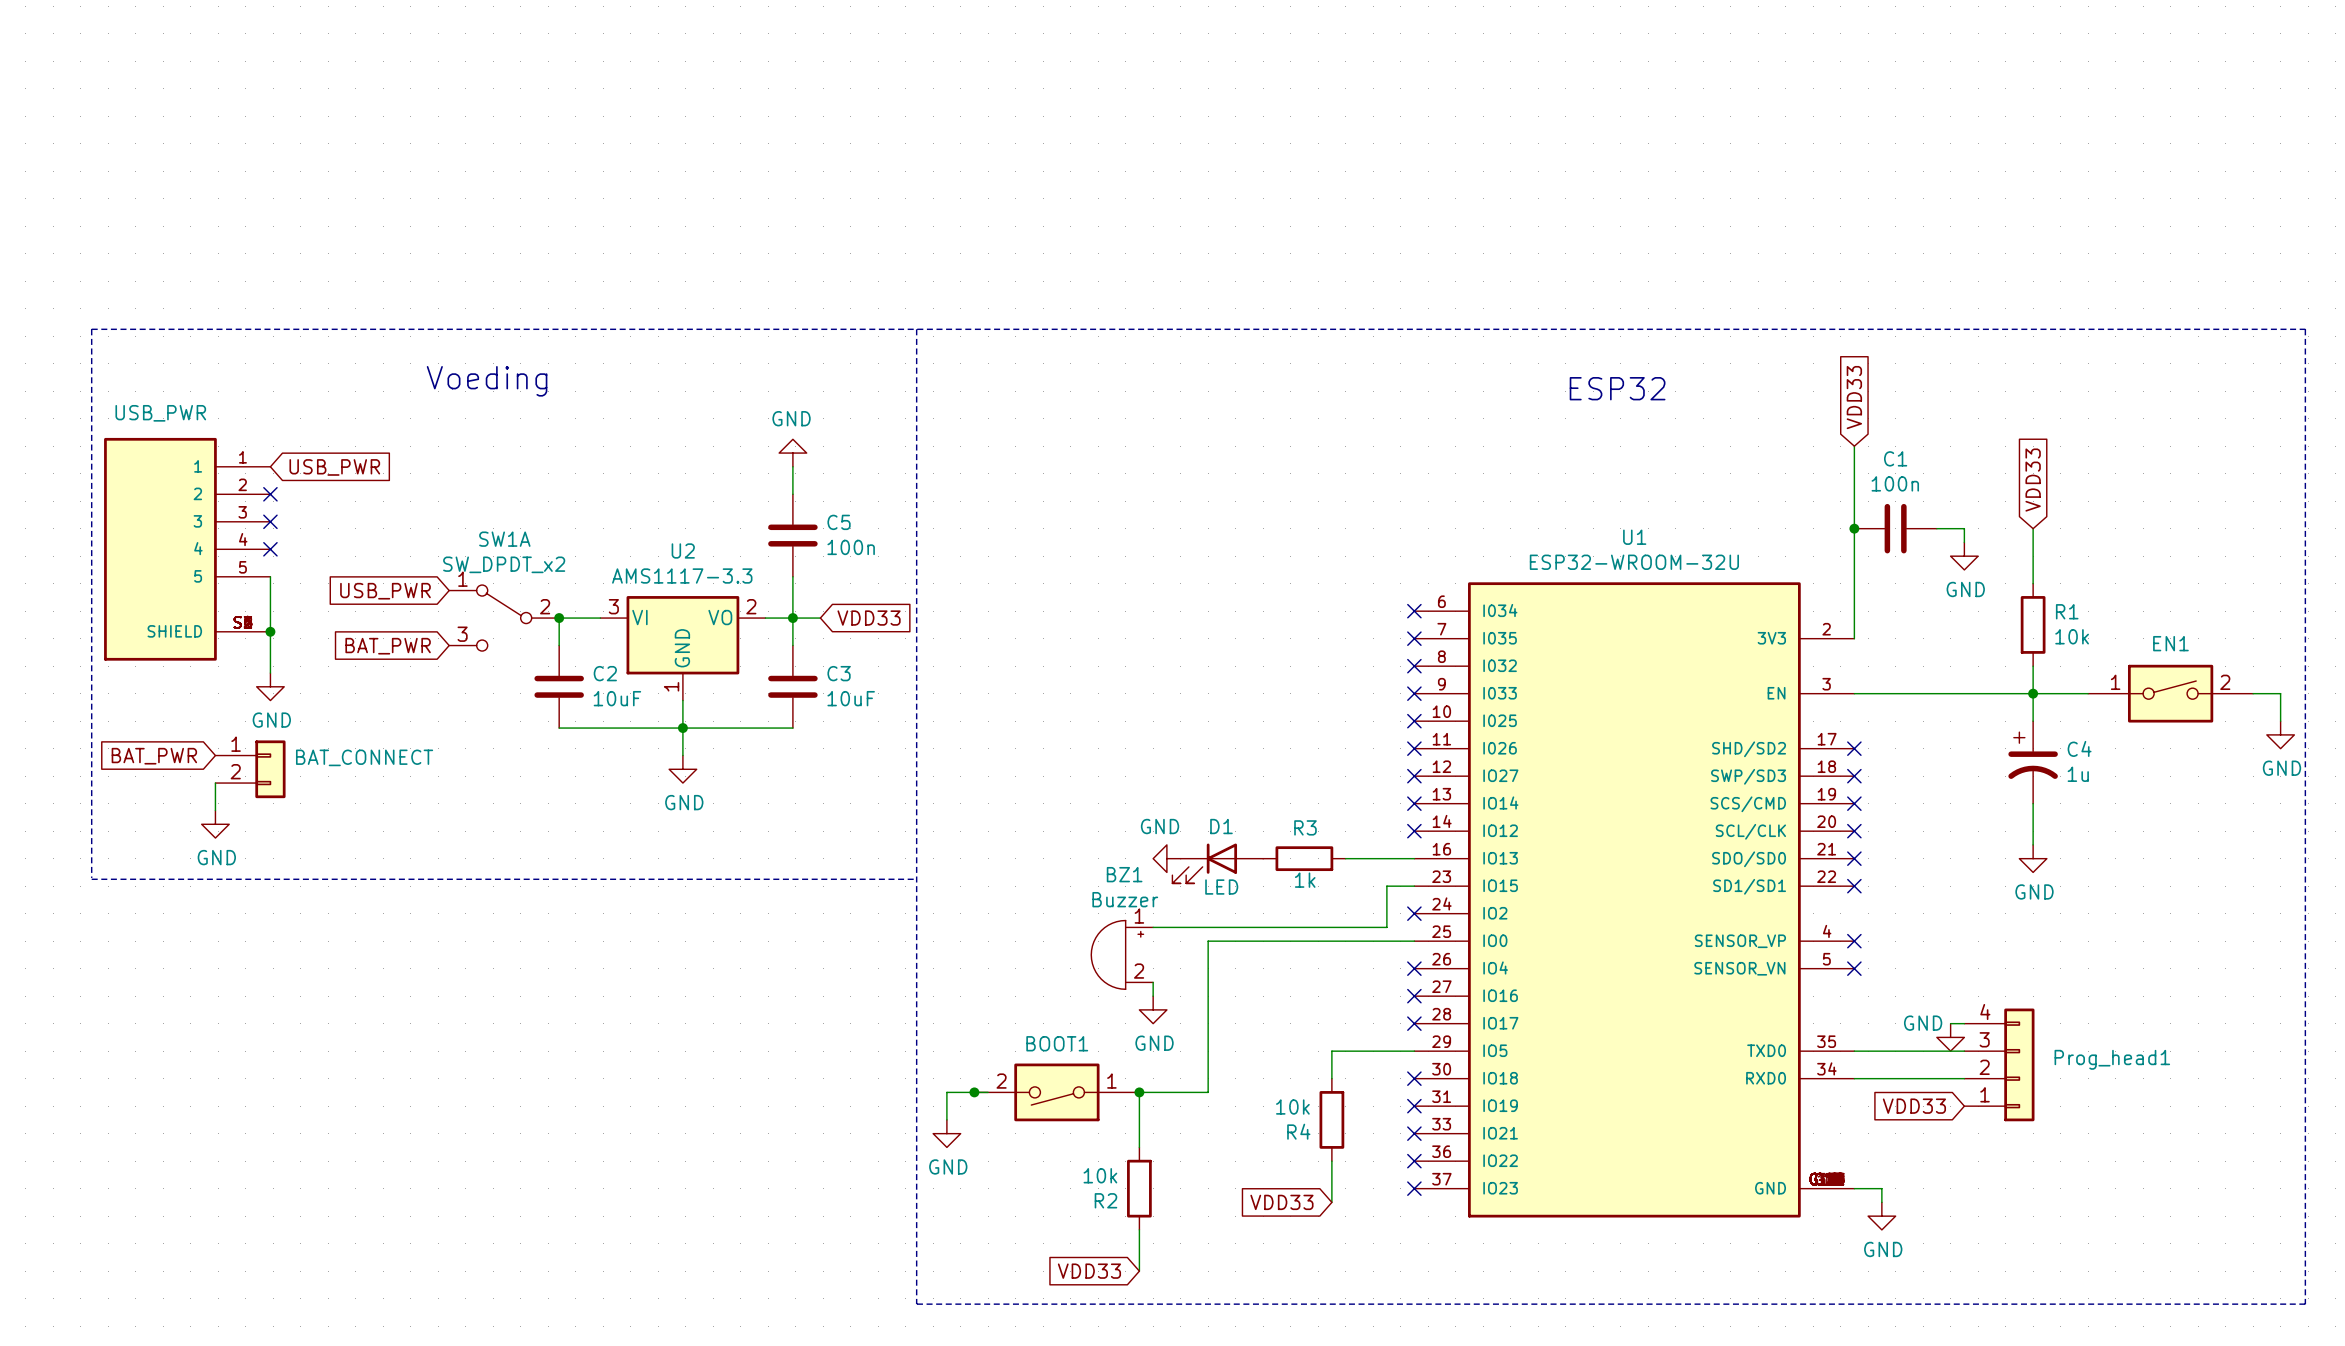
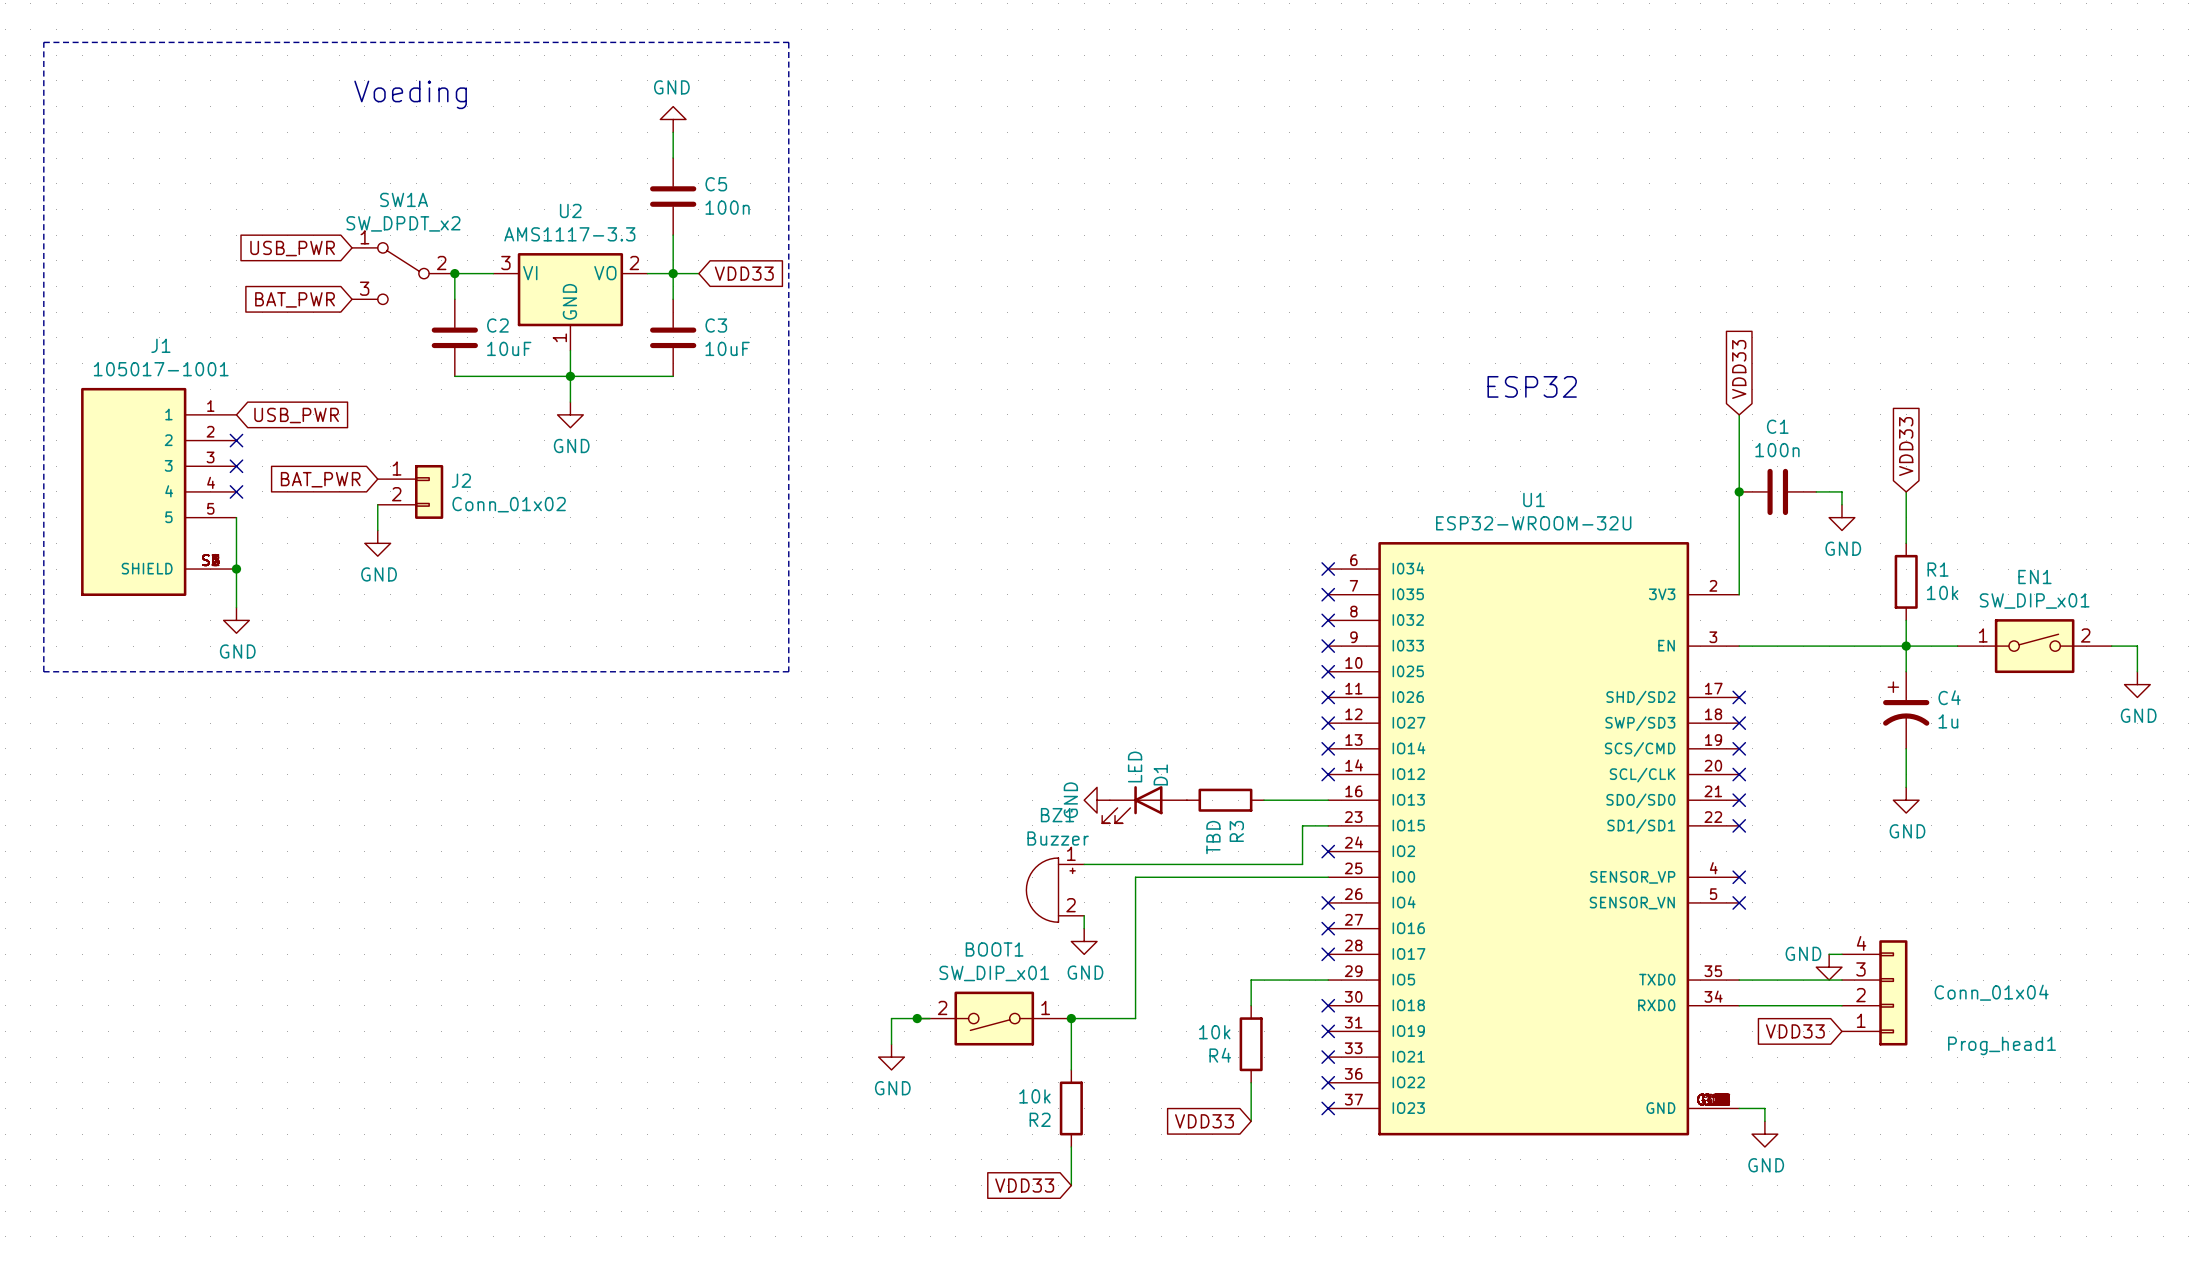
line: none -> (43, 42) (788, 42) (788, 671) (43, 671) (43, 42)
text: none -> Voeding (410, 94)
power symbol: none -> GND (673, 119)
wire: none -> (673, 132) (673, 158)
wire: none -> (673, 235) (673, 299)
global label: none -> USB_PWR (292, 248)
junction: none -> (454, 273)
wire: none -> (493, 273) (454, 273) (454, 299)
wire: none -> (647, 273) (698, 273)
junction: none -> (673, 273)
global label: none -> VDD33 (744, 273)
global label: none -> BAT_PWR (295, 299)
line: (916, 329) (916, 1304) (2305, 1304) (2305, 329) (91, 329) (91, 877) -> none
wire: none -> (570, 350) (570, 402)
text: Voeding (487, 381) -> none
text position: ESP32 (1617, 388) -> ESP32 (1532, 386)
wire: none -> (454, 376) (673, 376)
junction: none -> (570, 376)
power symbol: none -> GND (570, 414)
power symbol: GND (792, 453) -> none
wire: (792, 466) (792, 494) -> none
global label position: USB_PWR (334, 467) -> USB_PWR (296, 415)
no-connect mark: none -> (236, 440)
no-connect mark: (270, 494) -> none
no-connect mark: none -> (236, 466)
no-connect mark: (270, 521) -> none
J1: none -> 105017-1001 (158, 491)
no-connect mark: none -> (236, 491)
J2: none -> Conn_01x02 (410, 491)
C5 position: (792, 535) -> (673, 196)
wire: none -> (377, 504) (377, 530)
USB_PWR: (187, 549) -> none
no-connect mark: (270, 549) -> none
wire: (270, 576) (270, 673) -> (236, 517) (236, 607)
wire: (792, 576) (792, 645) -> none
power symbol: none -> GND (377, 543)
global label: USB_PWR (385, 591) -> none
SW1A position: (504, 618) -> (403, 273)
junction: (559, 618) -> none
wire: (600, 618) (559, 618) (559, 645) -> none
wire: (765, 618) (820, 618) -> none
junction: (792, 618) -> none
global label: VDD33 (869, 618) -> none
junction position: (270, 631) -> (236, 569)
EN1 name position: EN1 (2170, 643) -> EN1 (2034, 577)
EN1 value: none -> SW_DIP_x01 (2034, 601)
global label position: BAT_PWR (388, 646) -> BAT_PWR (320, 479)
U2 position: (682, 648) -> (570, 301)
power symbol position: GND (270, 686) -> GND (236, 620)
C2 position: (559, 686) -> (454, 337)
C3 position: (792, 686) -> (673, 337)
wire: (682, 700) (682, 755) -> none
wire: (559, 728) (792, 728) -> none
junction: (682, 728) -> none
global label: BAT_PWR (154, 756) -> none
BAT_CONNECT: (250, 769) -> none
power symbol: GND (682, 769) -> none
wire: (215, 783) (215, 810) -> none
power symbol: GND (215, 824) -> none
power symbol text rotation: 0° (1160, 826) -> 90° counterclockwise (1070, 800)
D1 name rotation: 0° (1221, 826) -> 90° counterclockwise (1160, 774)
R3 name rotation: 0° (1305, 827) -> 90° counterclockwise (1236, 831)
R3 name position: R3 (1305, 827) -> R3 (1236, 831)
line: (91, 879) (916, 879) -> none
R3 value: 1k (1305, 880) -> TBD (1213, 837)
D1 value rotation: 0° (1221, 887) -> 90° counterclockwise (1135, 766)
D1 value position: LED (1221, 887) -> LED (1135, 766)
BOOT1 name position: BOOT1 (1057, 1043) -> BOOT1 (994, 949)
BOOT1 value: none -> SW_DIP_x01 (994, 973)
Prog_head1 name position: Prog_head1 (2112, 1059) -> Prog_head1 (2002, 1045)
Prog_head1 value: none -> Conn_01x04 (1991, 992)

